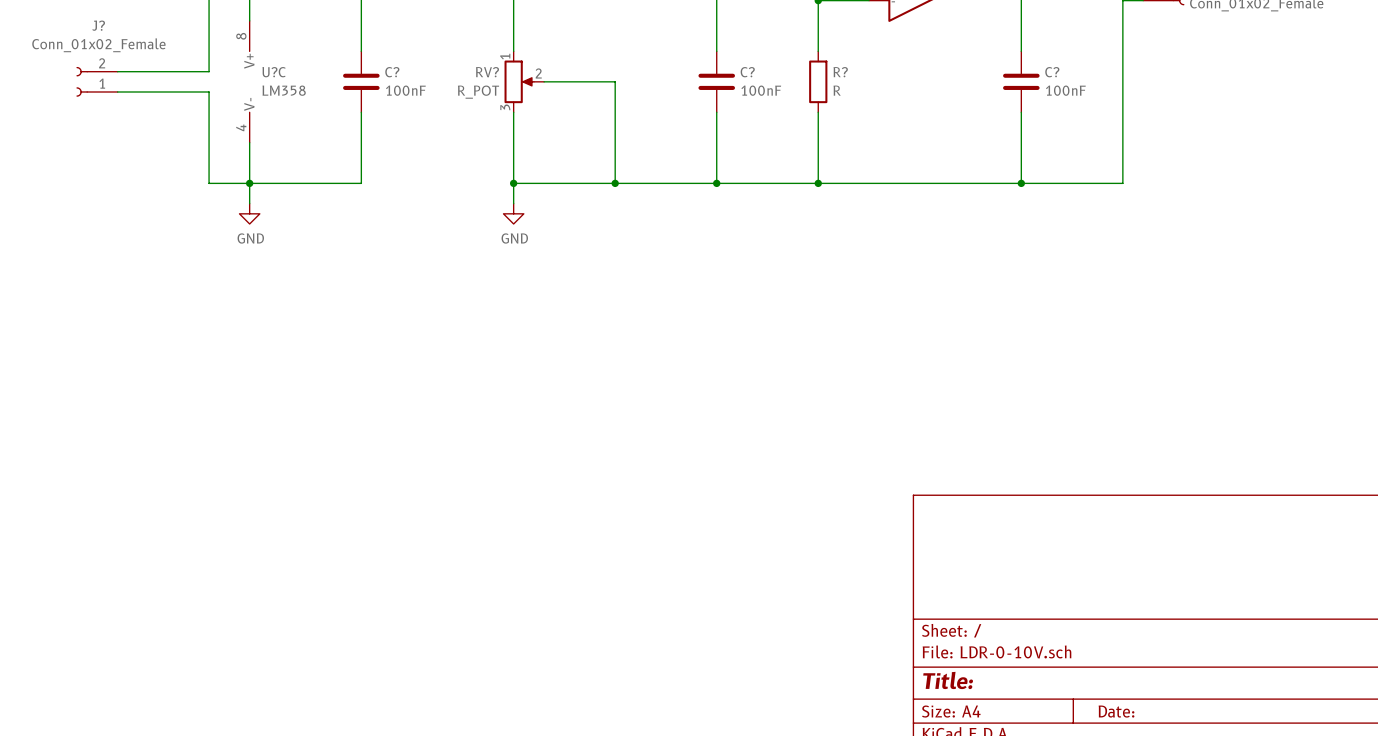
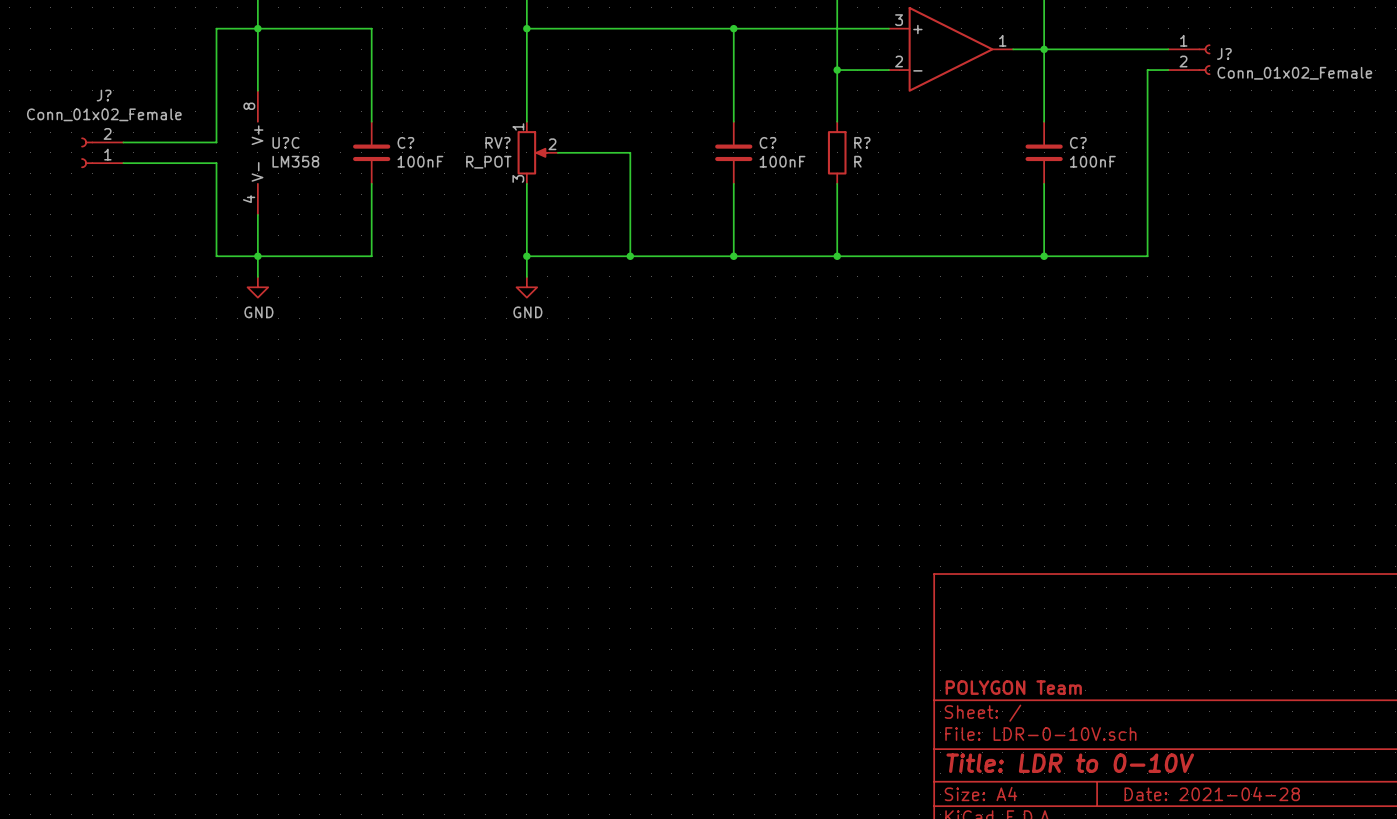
title block: none -> POLYGON Team (1013, 687)
title block: Title: (948, 680) -> Title: LDR to 0-10V (1070, 763)
title block: Date: (1116, 711) -> Date: 2021-04-28 (1212, 794)

